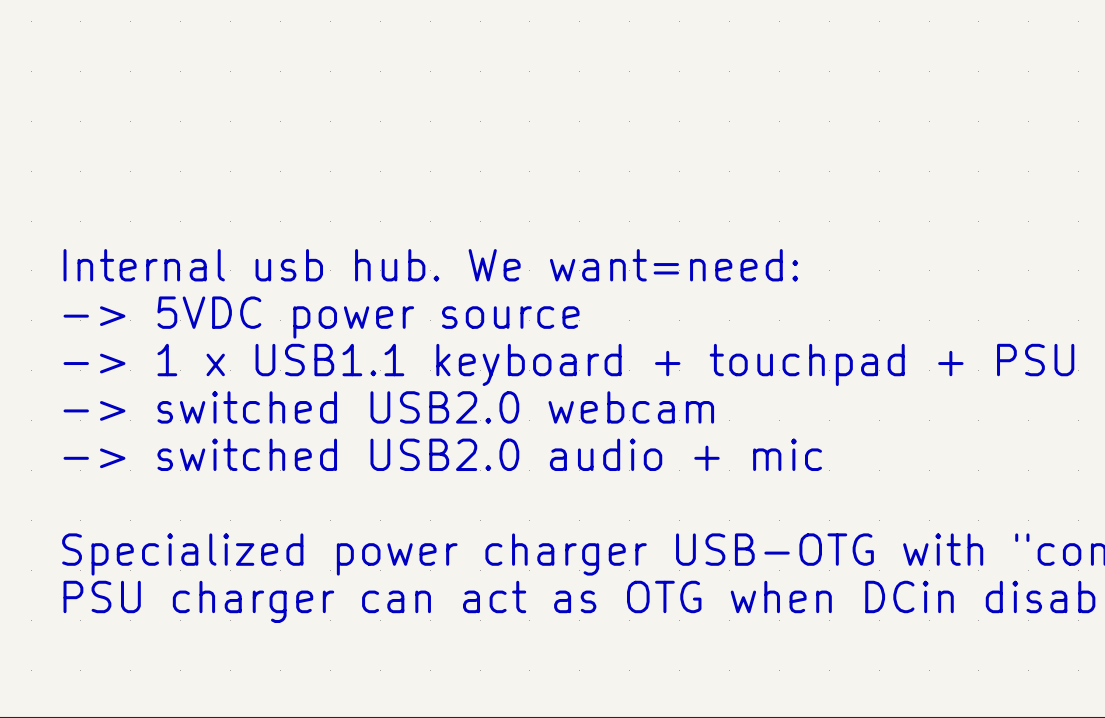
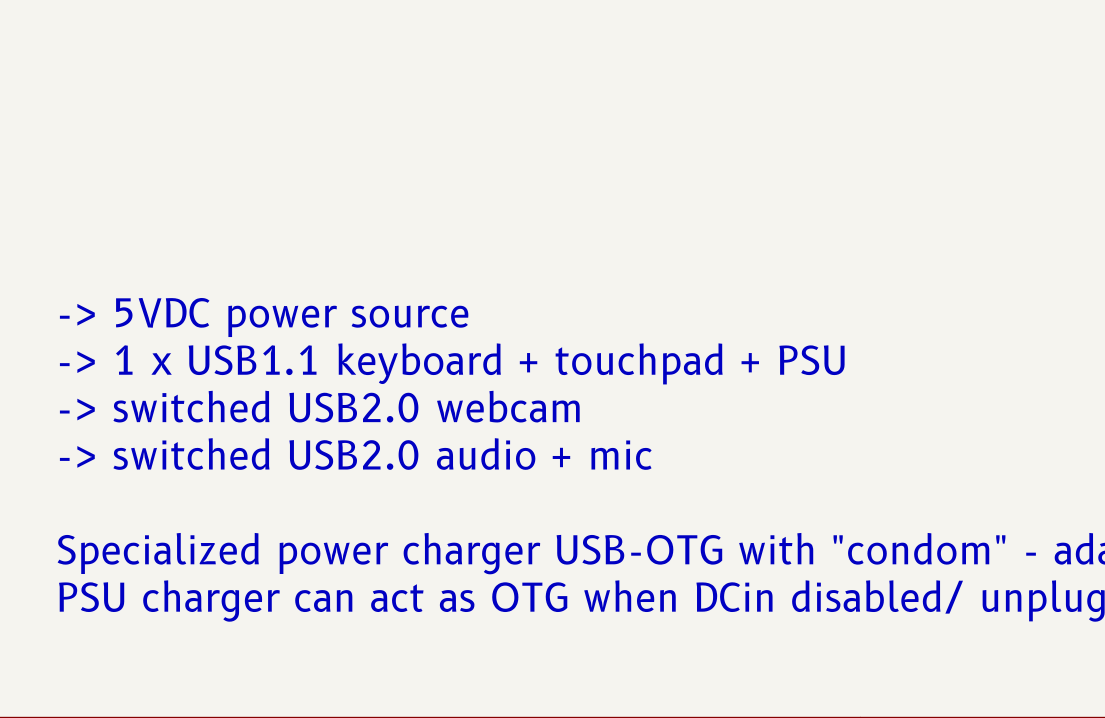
text: Internal usb hub. We want=need: (430, 265) -> none

